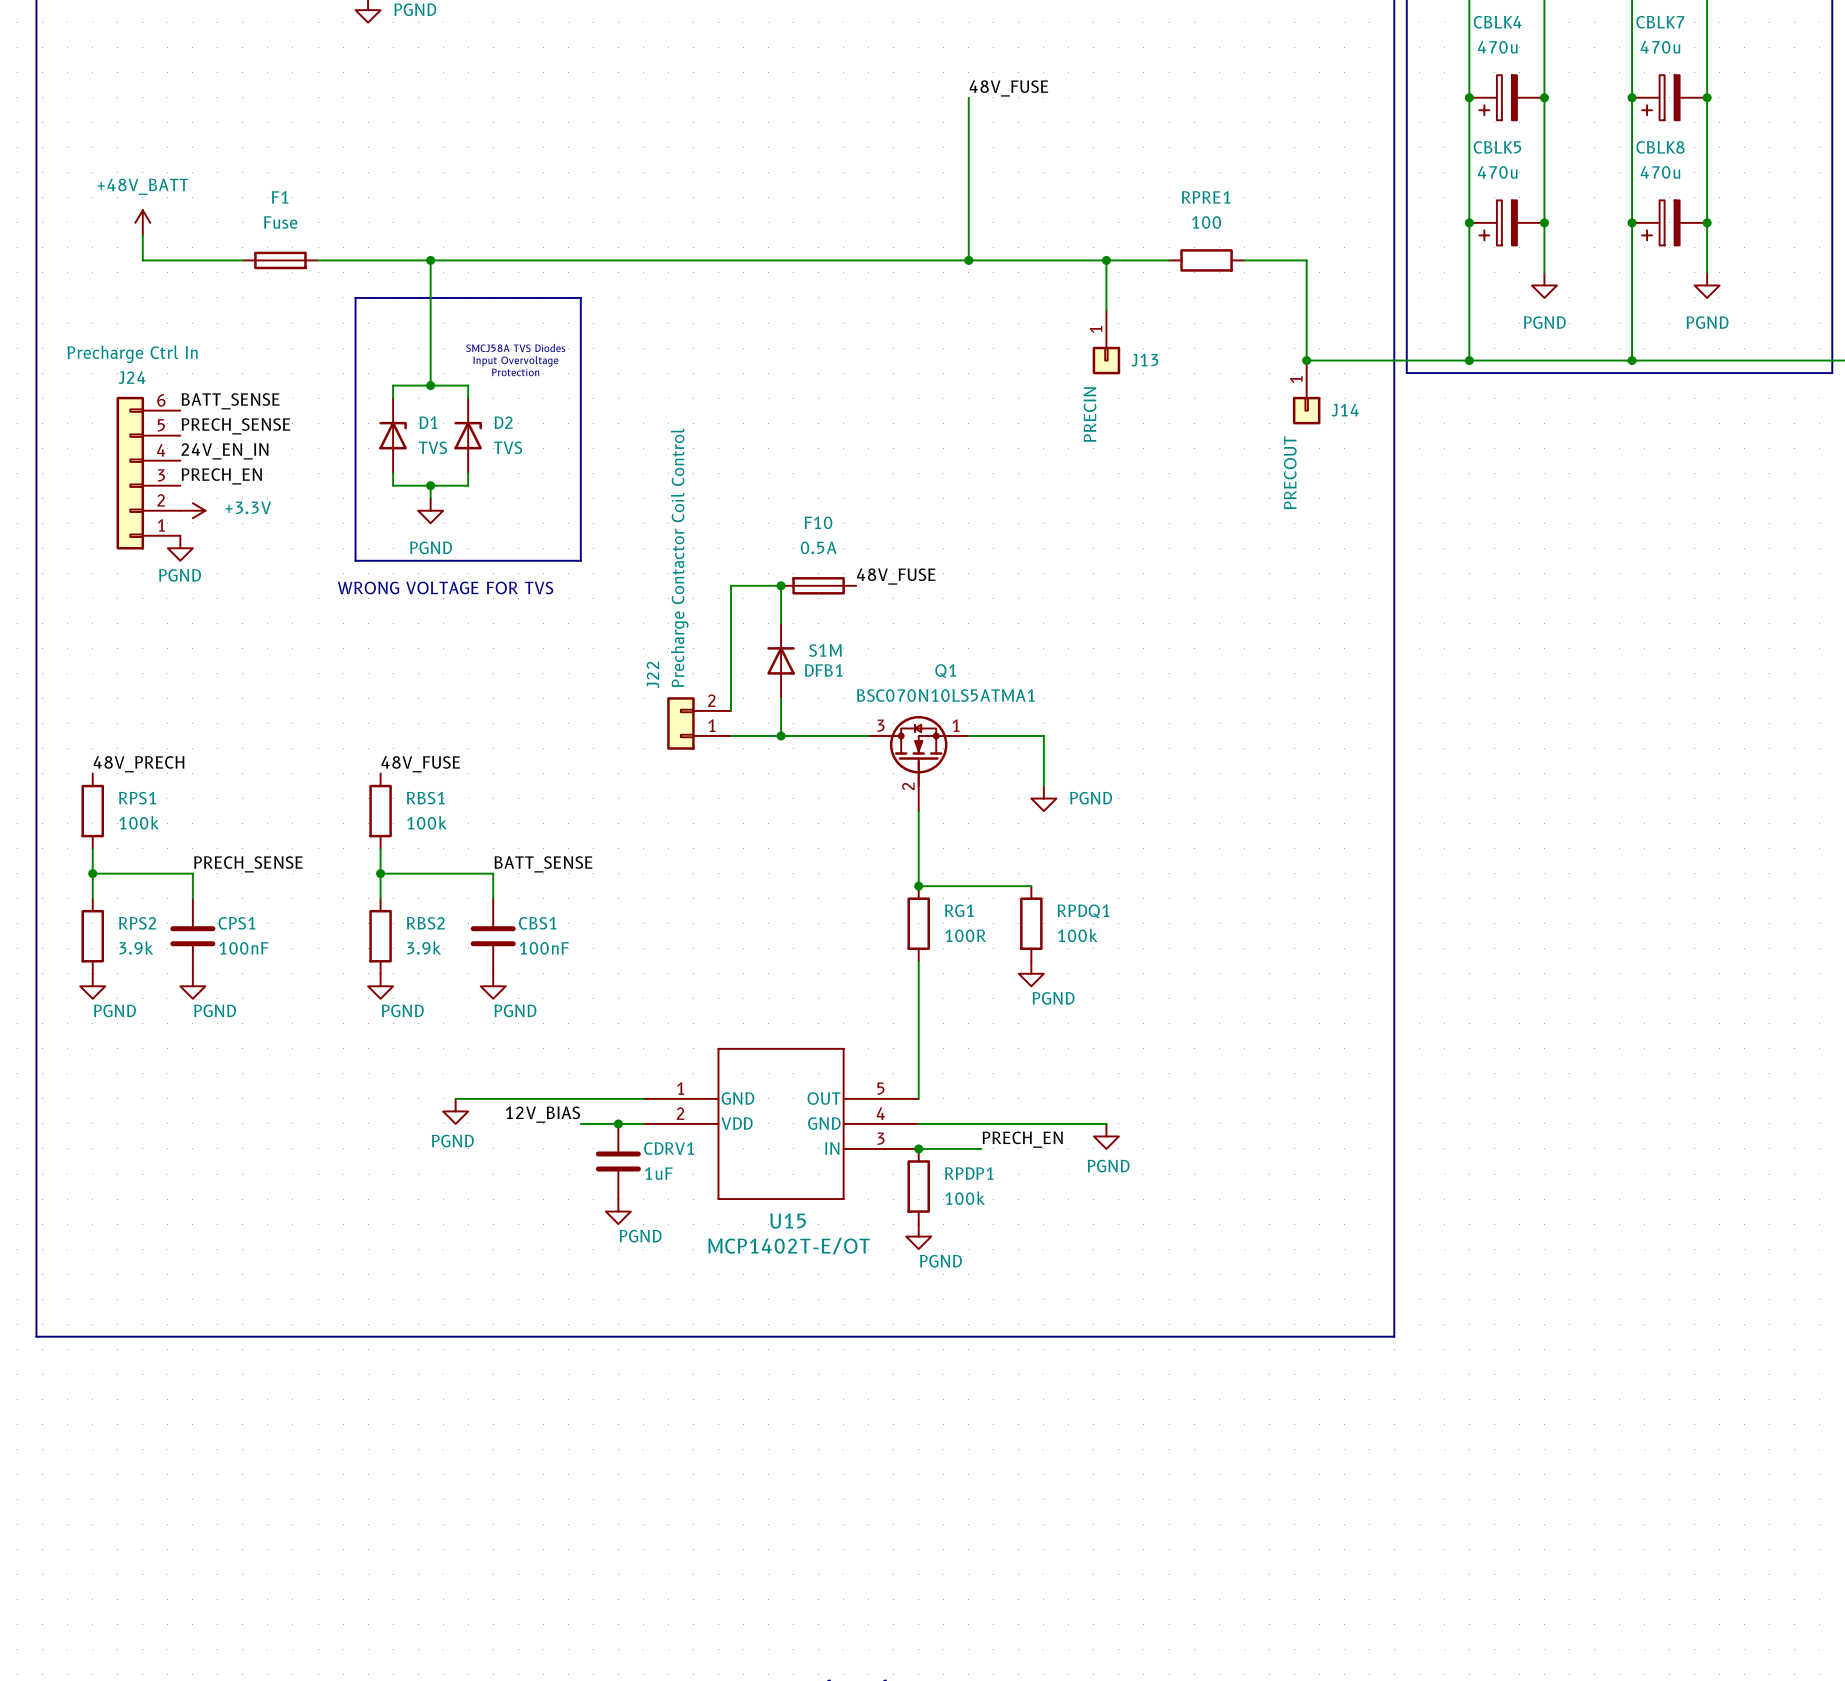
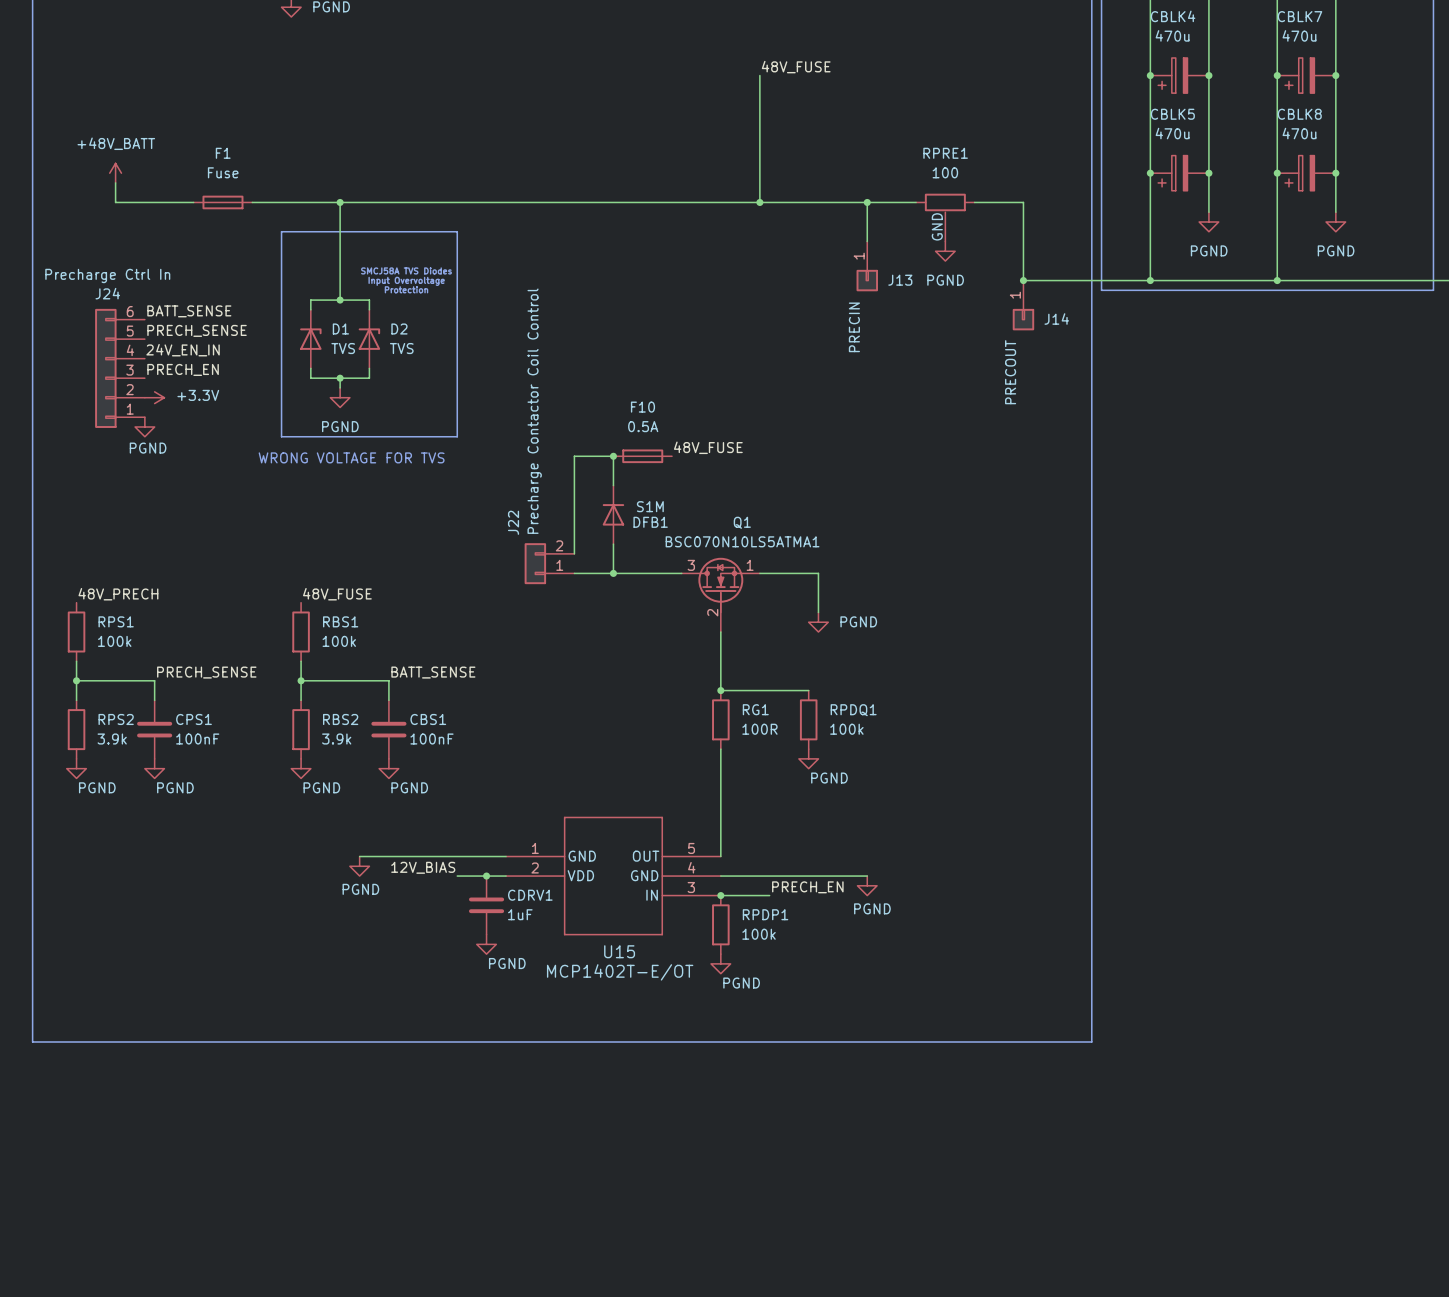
RPRE1 symbol: [1169, 249, 1245, 272] -> [916, 193, 975, 242]
power symbol: none -> PGND (945, 251)

